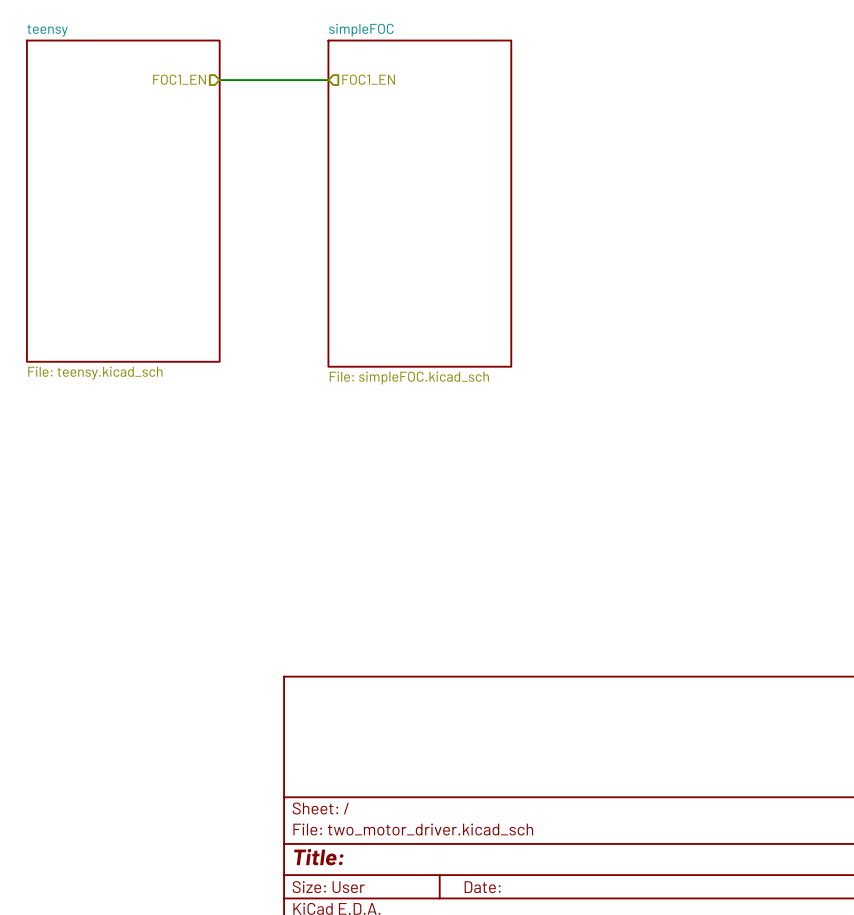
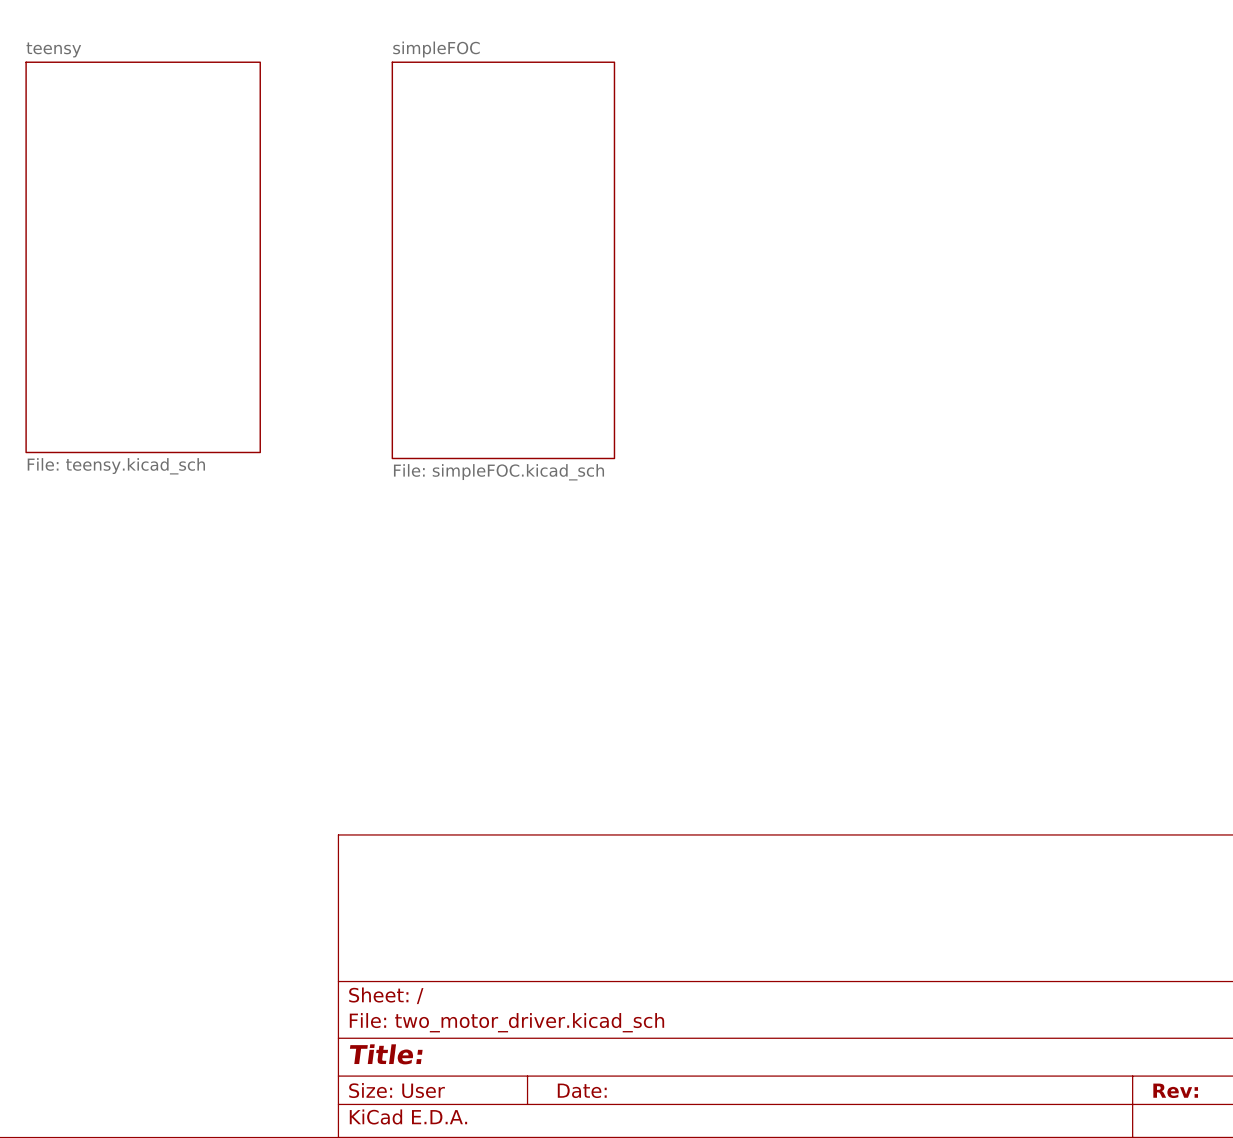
hierarchical label: FOC1_EN (179, 79) -> none
hierarchical label: FOC1_EN (368, 79) -> none
wire: (219, 80) (328, 80) -> none

